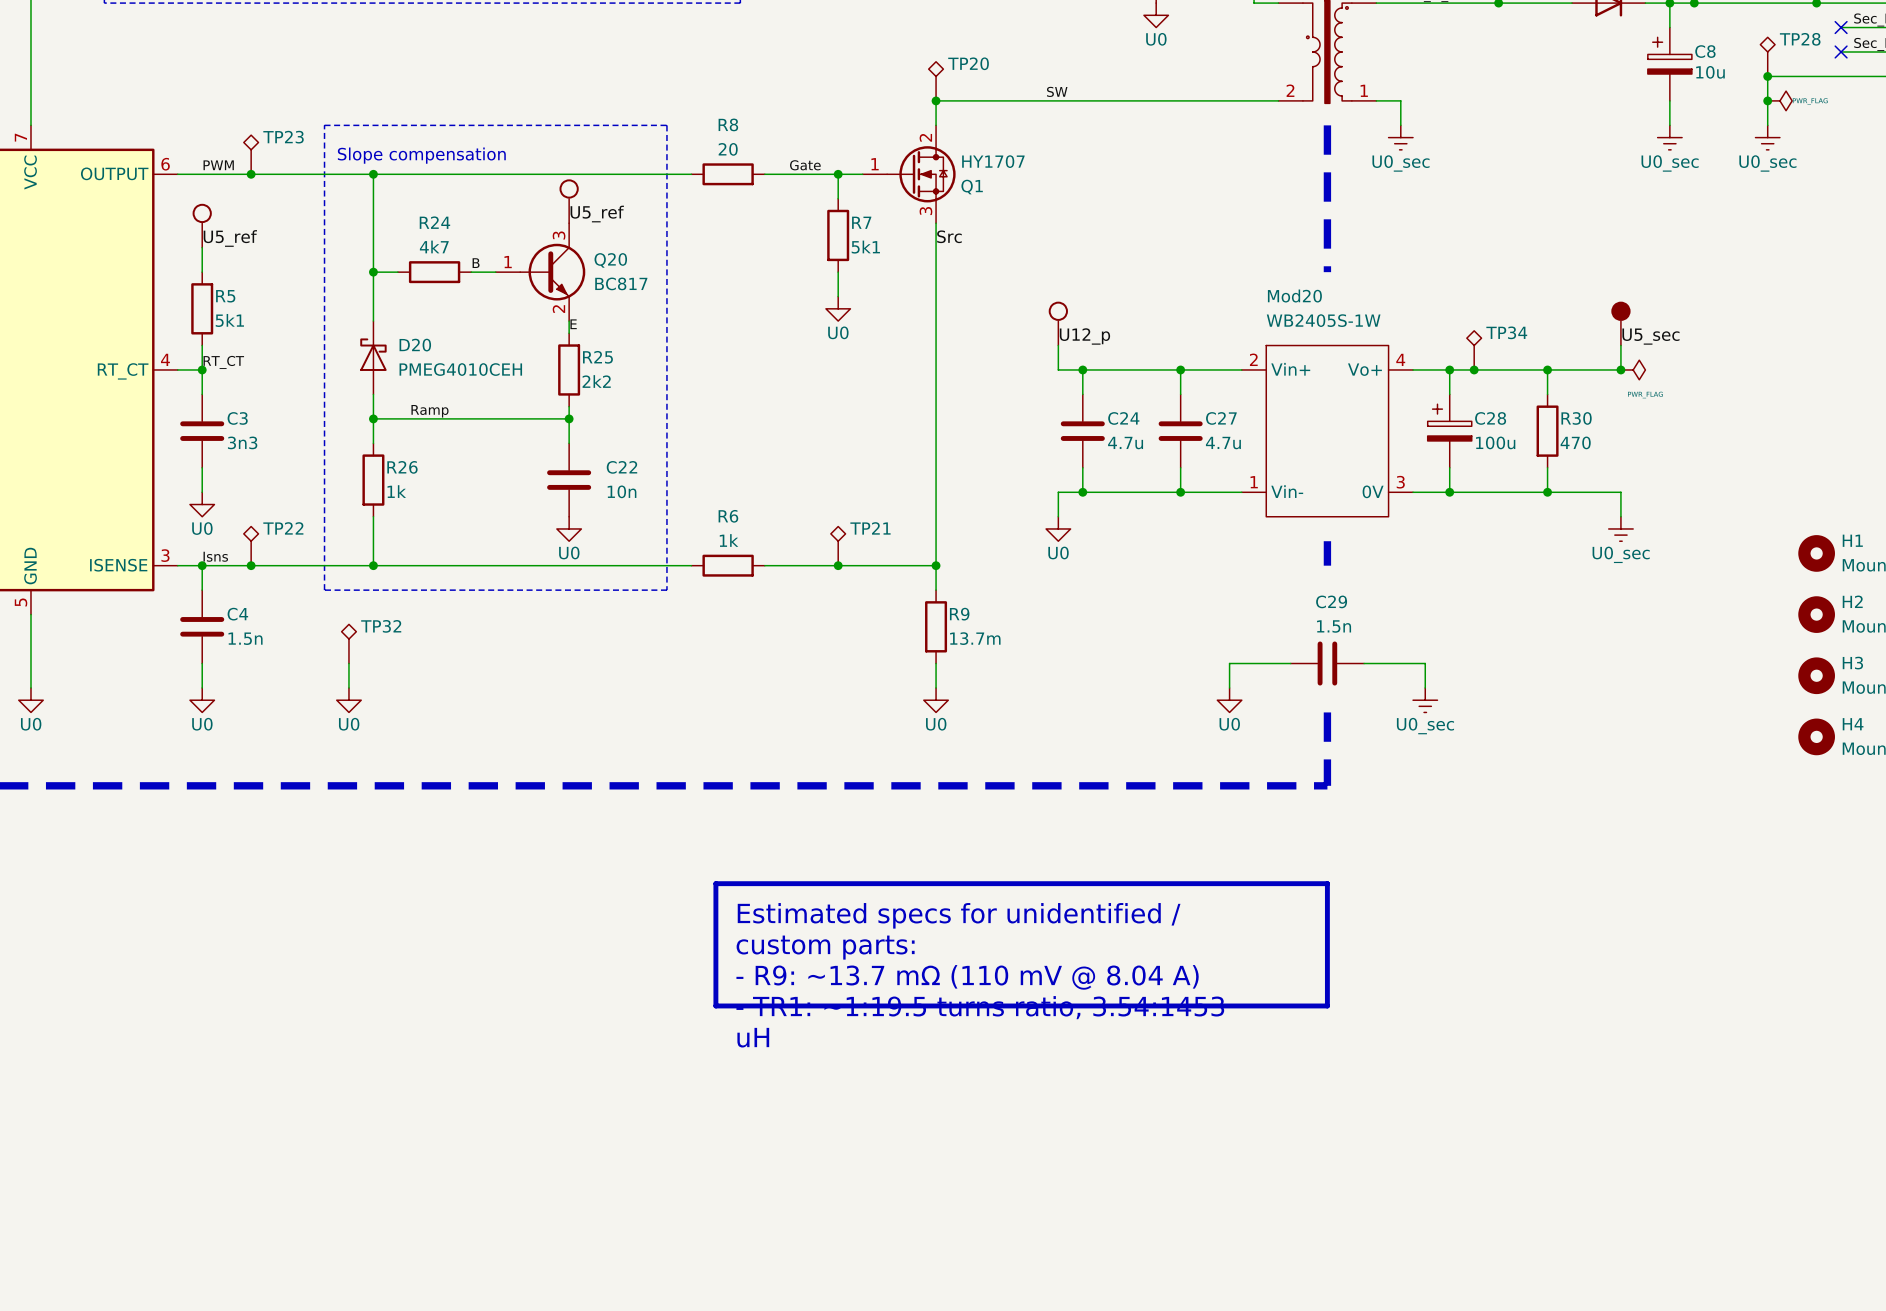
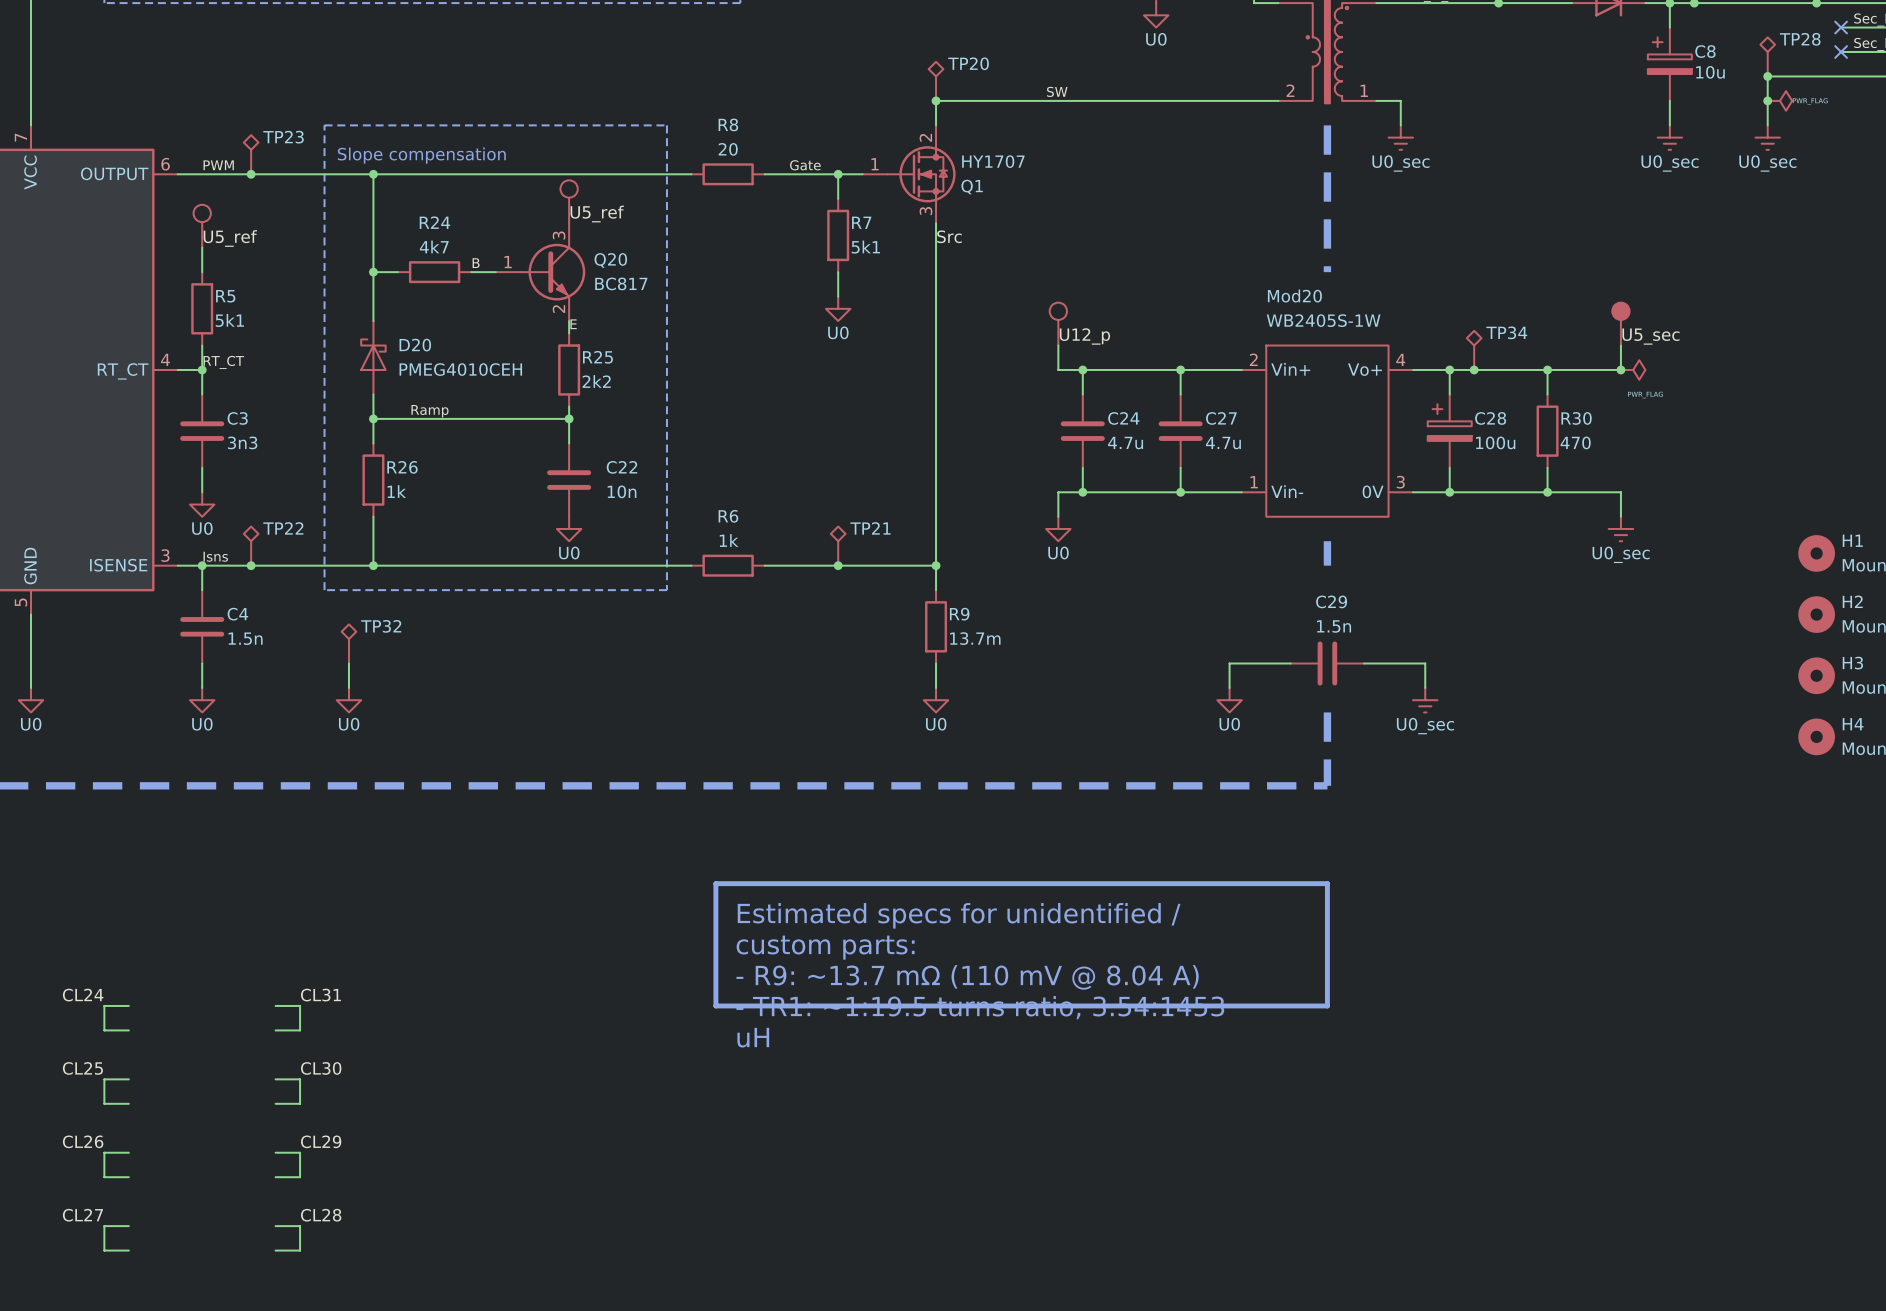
label: none -> CL24 (83, 995)
label: none -> CL31 (320, 995)
wire: none -> (128, 1005) (104, 1005) (104, 1030) (128, 1030)
wire: none -> (275, 1005) (300, 1005) (300, 1030) (275, 1030)
label: none -> CL25 (82, 1068)
label: none -> CL30 (321, 1068)
wire: none -> (128, 1079) (104, 1079) (104, 1103) (128, 1103)
wire: none -> (275, 1079) (300, 1079) (300, 1103) (275, 1103)
label: none -> CL26 (83, 1141)
label: none -> CL29 (321, 1141)
wire: none -> (128, 1152) (104, 1152) (104, 1177) (128, 1177)
wire: none -> (275, 1152) (300, 1152) (300, 1177) (275, 1177)
label: none -> CL27 (82, 1215)
label: none -> CL28 (321, 1215)
wire: none -> (128, 1226) (104, 1226) (104, 1250) (128, 1250)
wire: none -> (275, 1226) (300, 1226) (300, 1250) (275, 1250)

